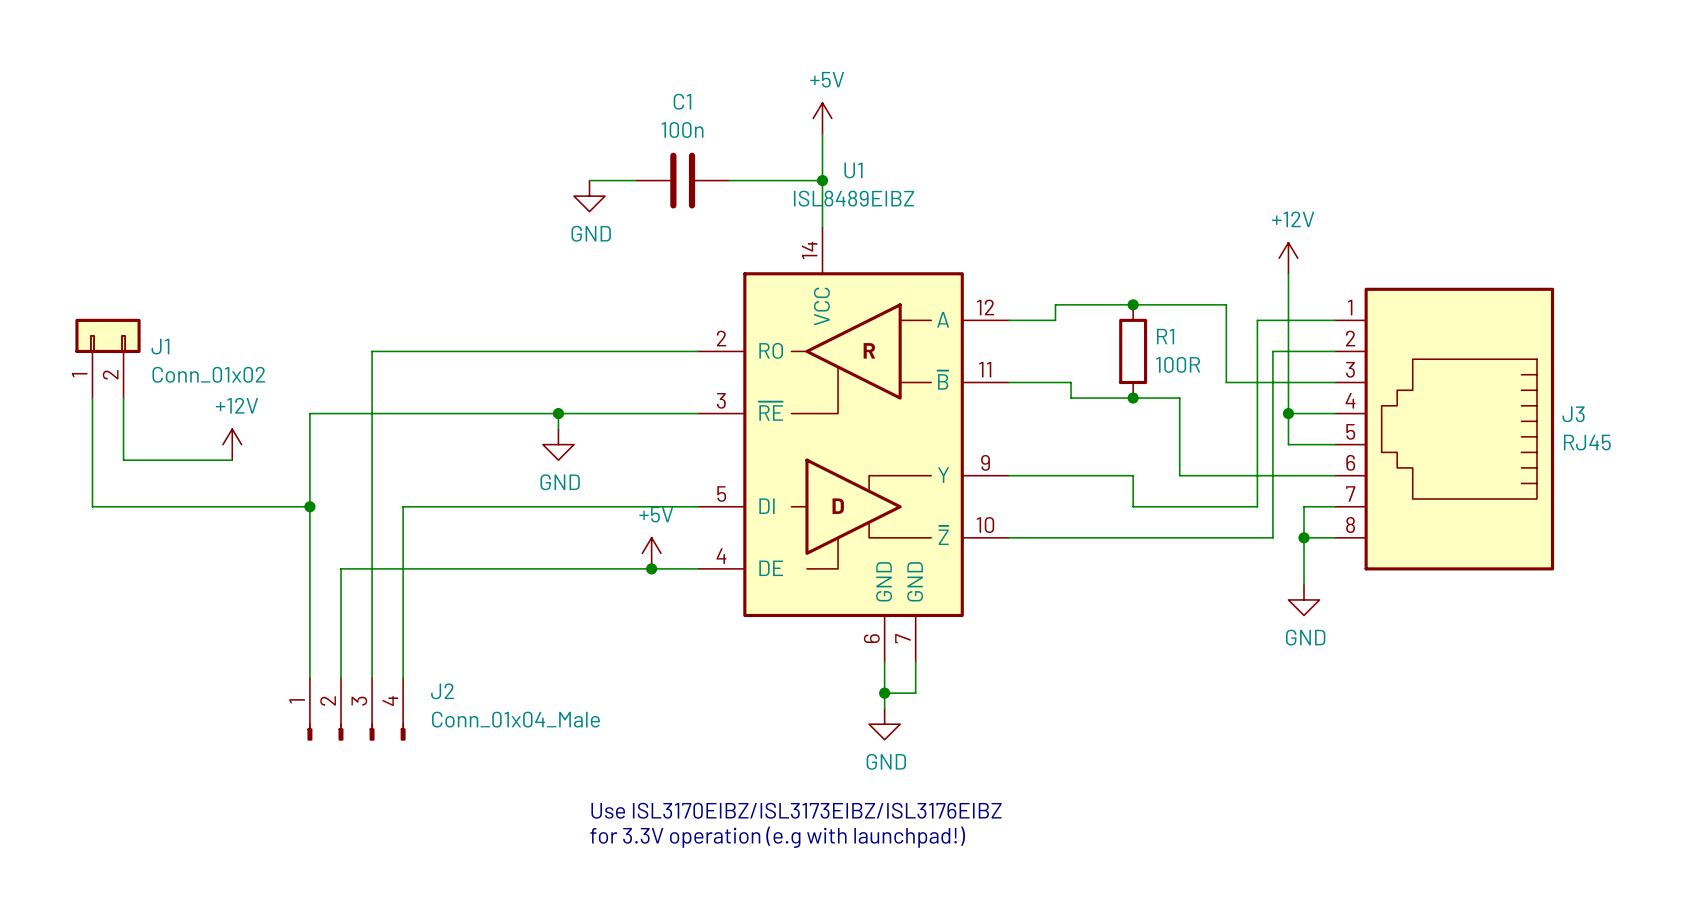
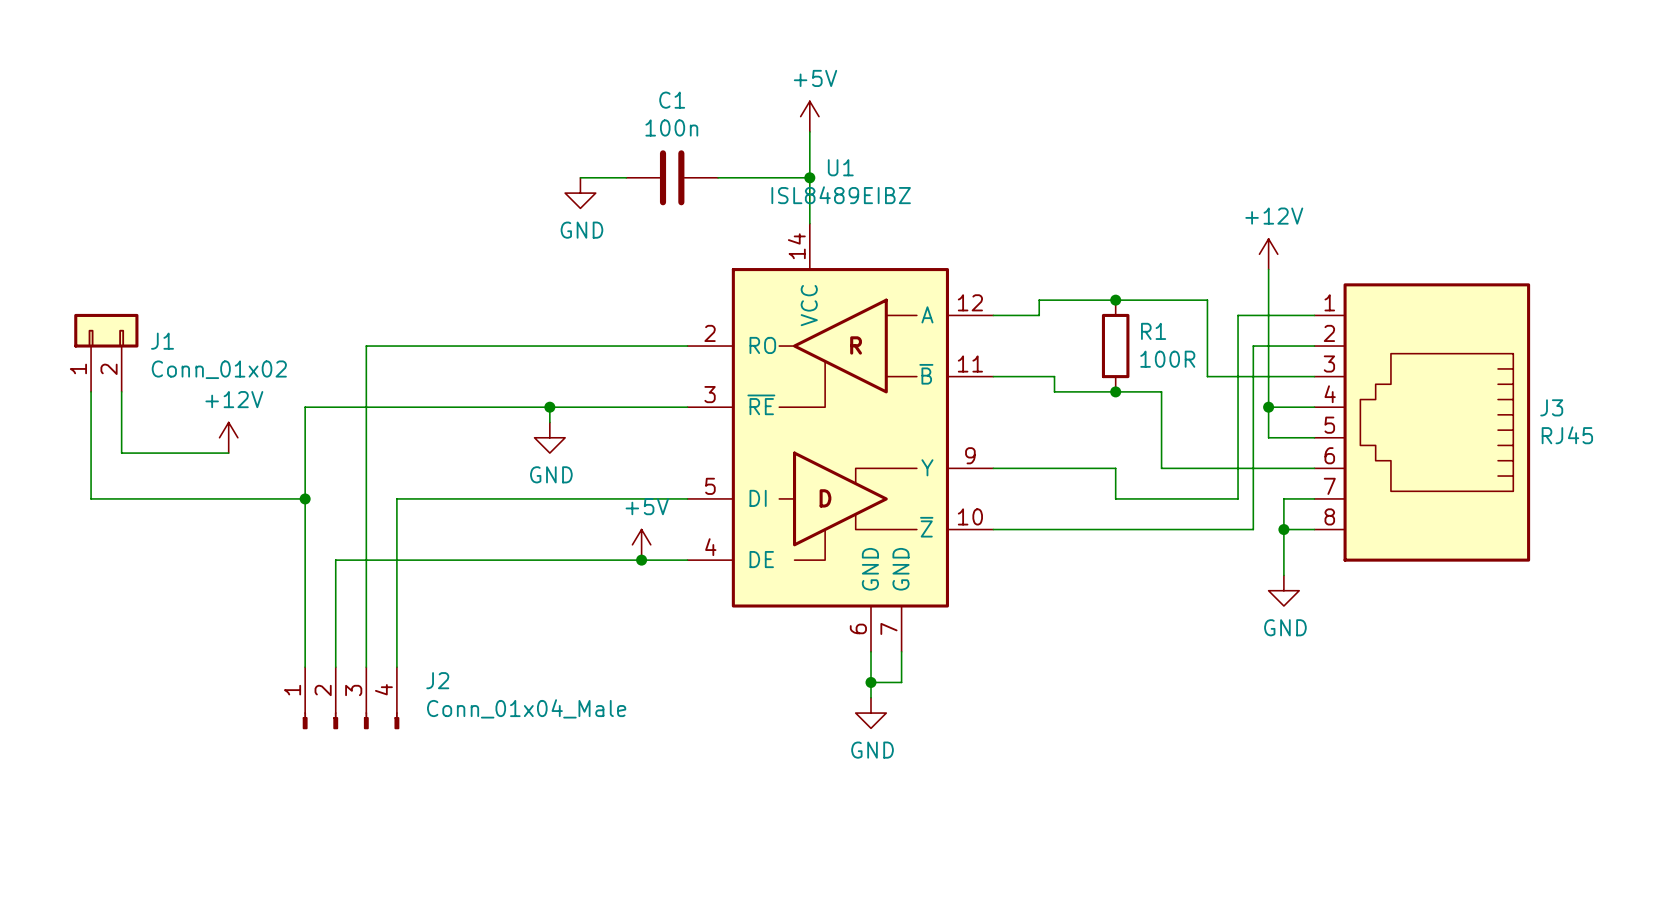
text: Use ISL3170EIBZ/ISL3173EIBZ/ISL3176EIBZ (796, 810) -> none
text: for 3.3V operation (e.g with launchpad!) (777, 837) -> none

